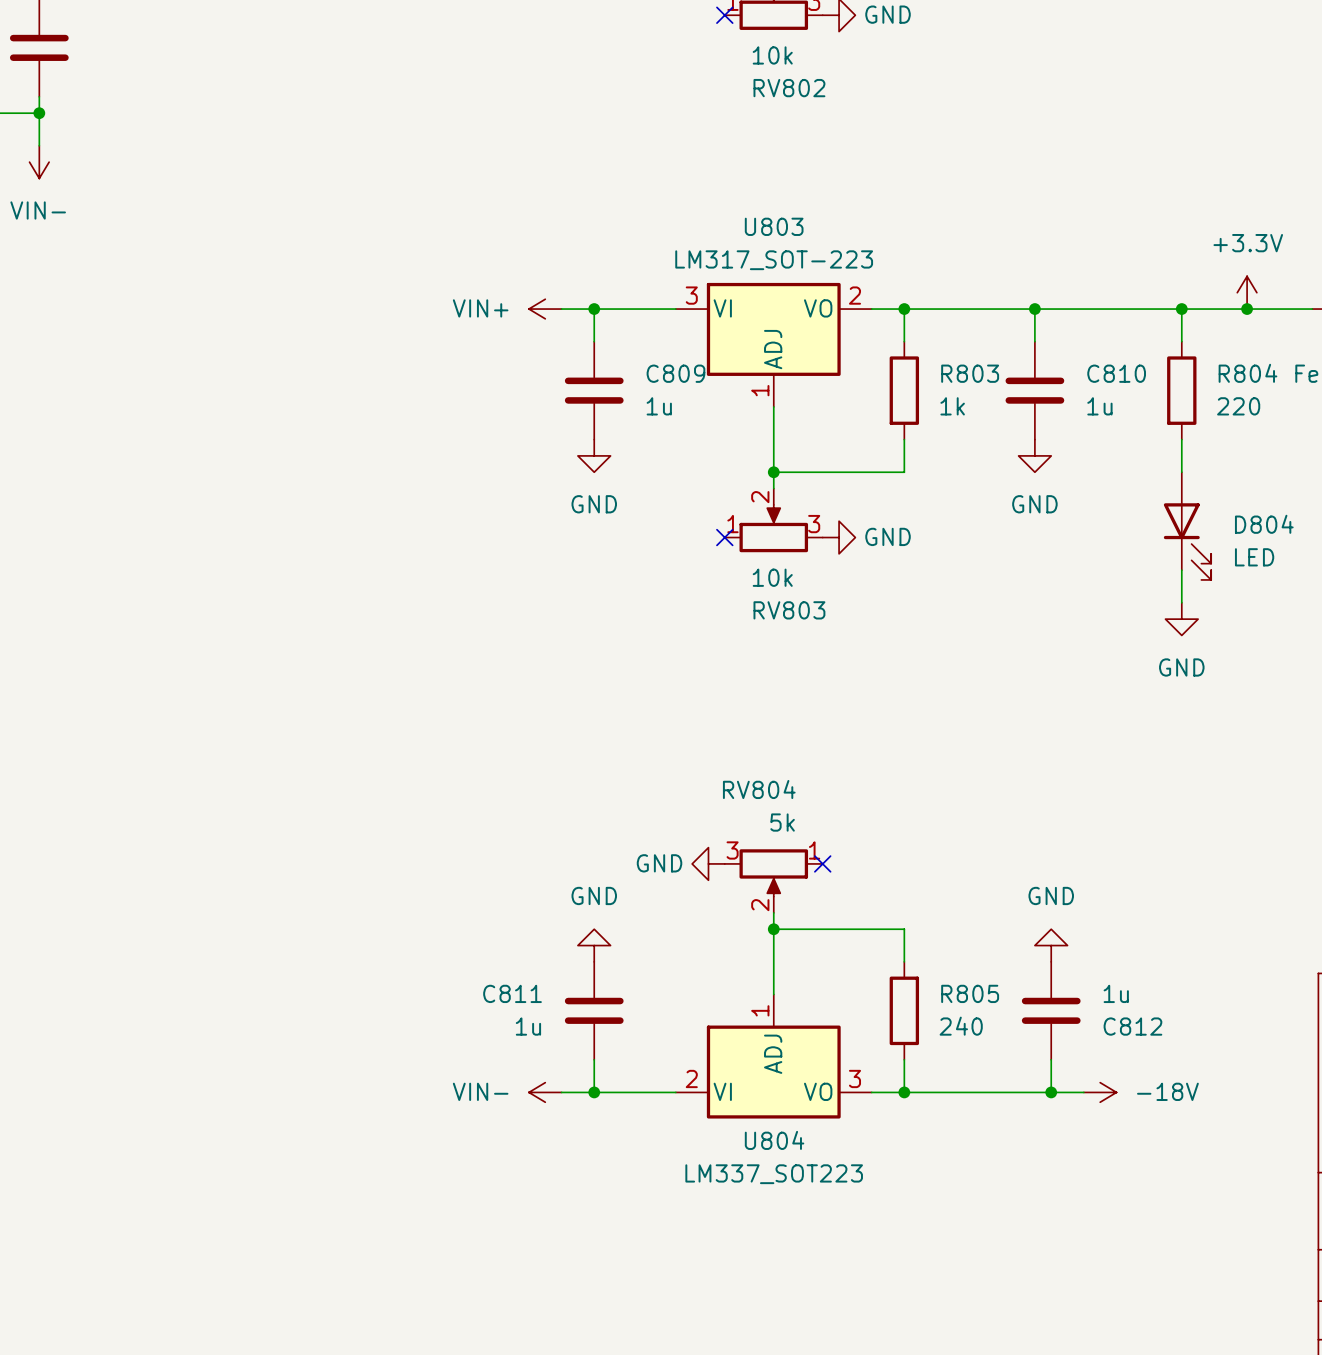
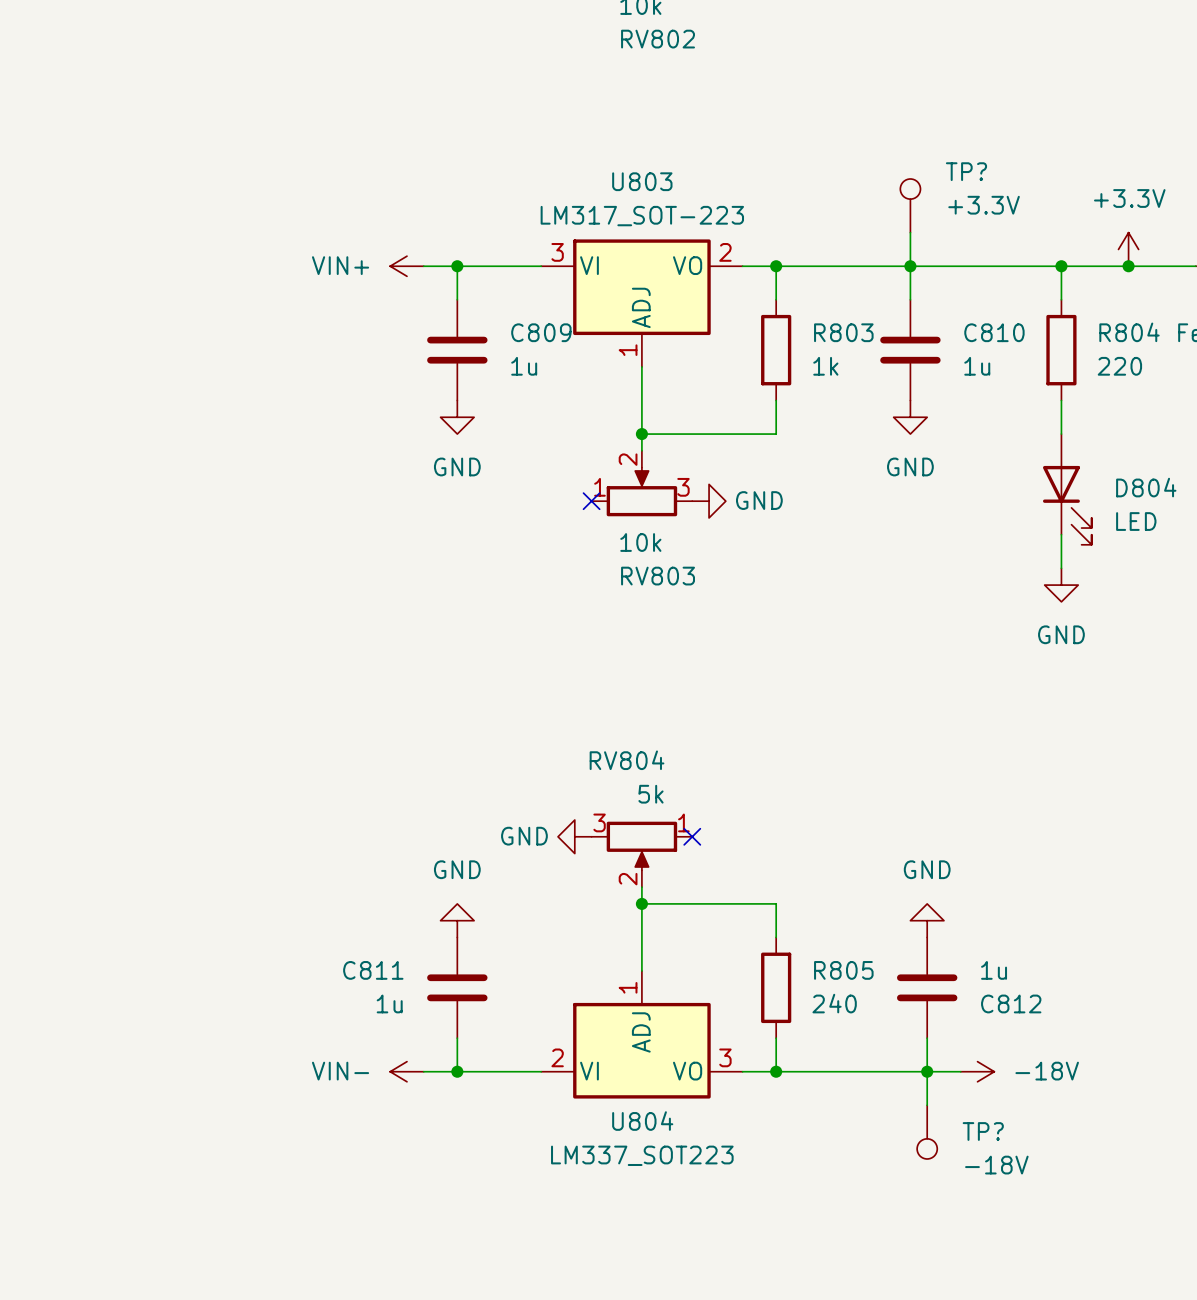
TP?: none -> +3.3V (910, 205)
wire: none -> (910, 232) (910, 266)
wire: none -> (927, 1071) (927, 1105)
TP?: none -> -18V (927, 1132)

